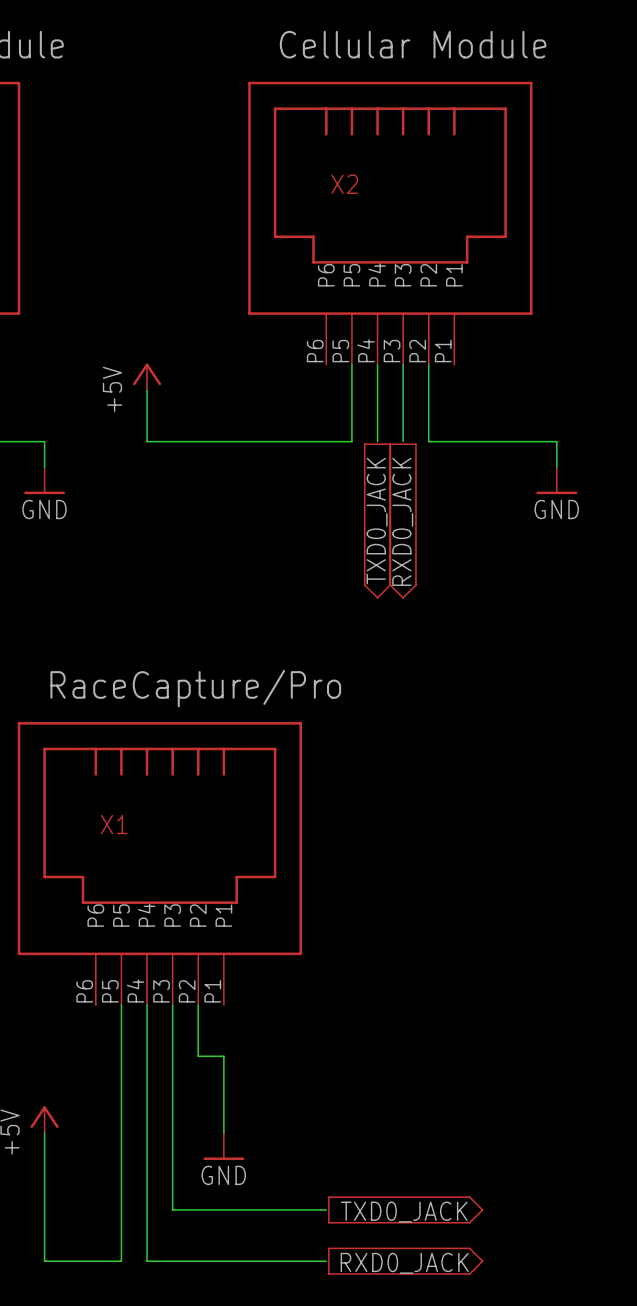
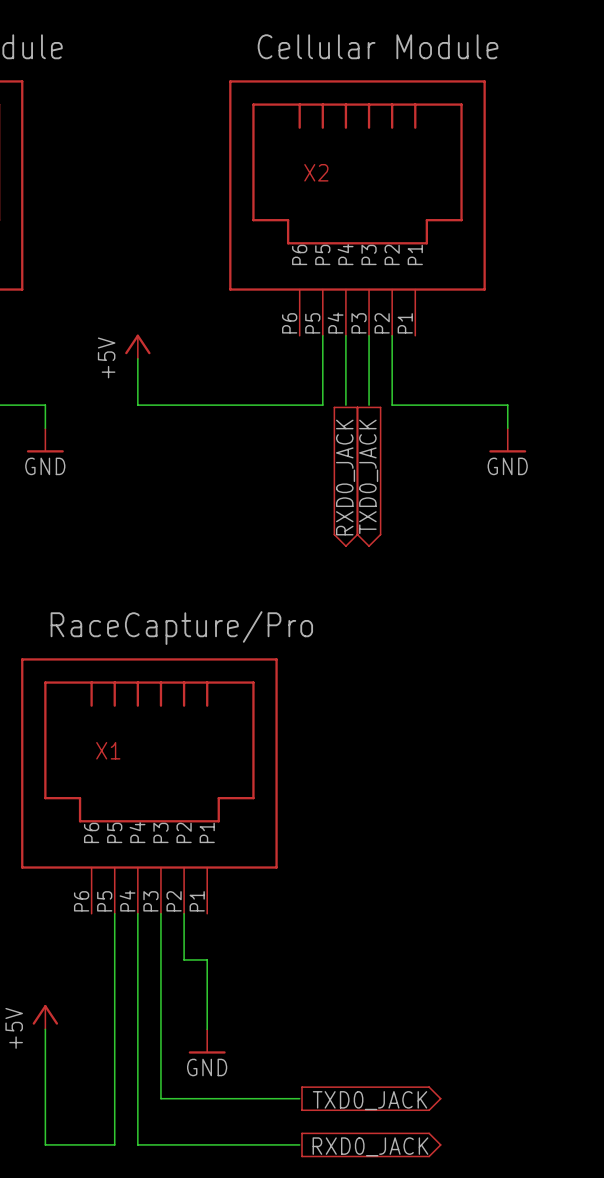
label: TXD0_JACK (377, 521) -> RXD0_JACK (345, 477)
label: RXD0_JACK (402, 521) -> TXD0_JACK (368, 476)

